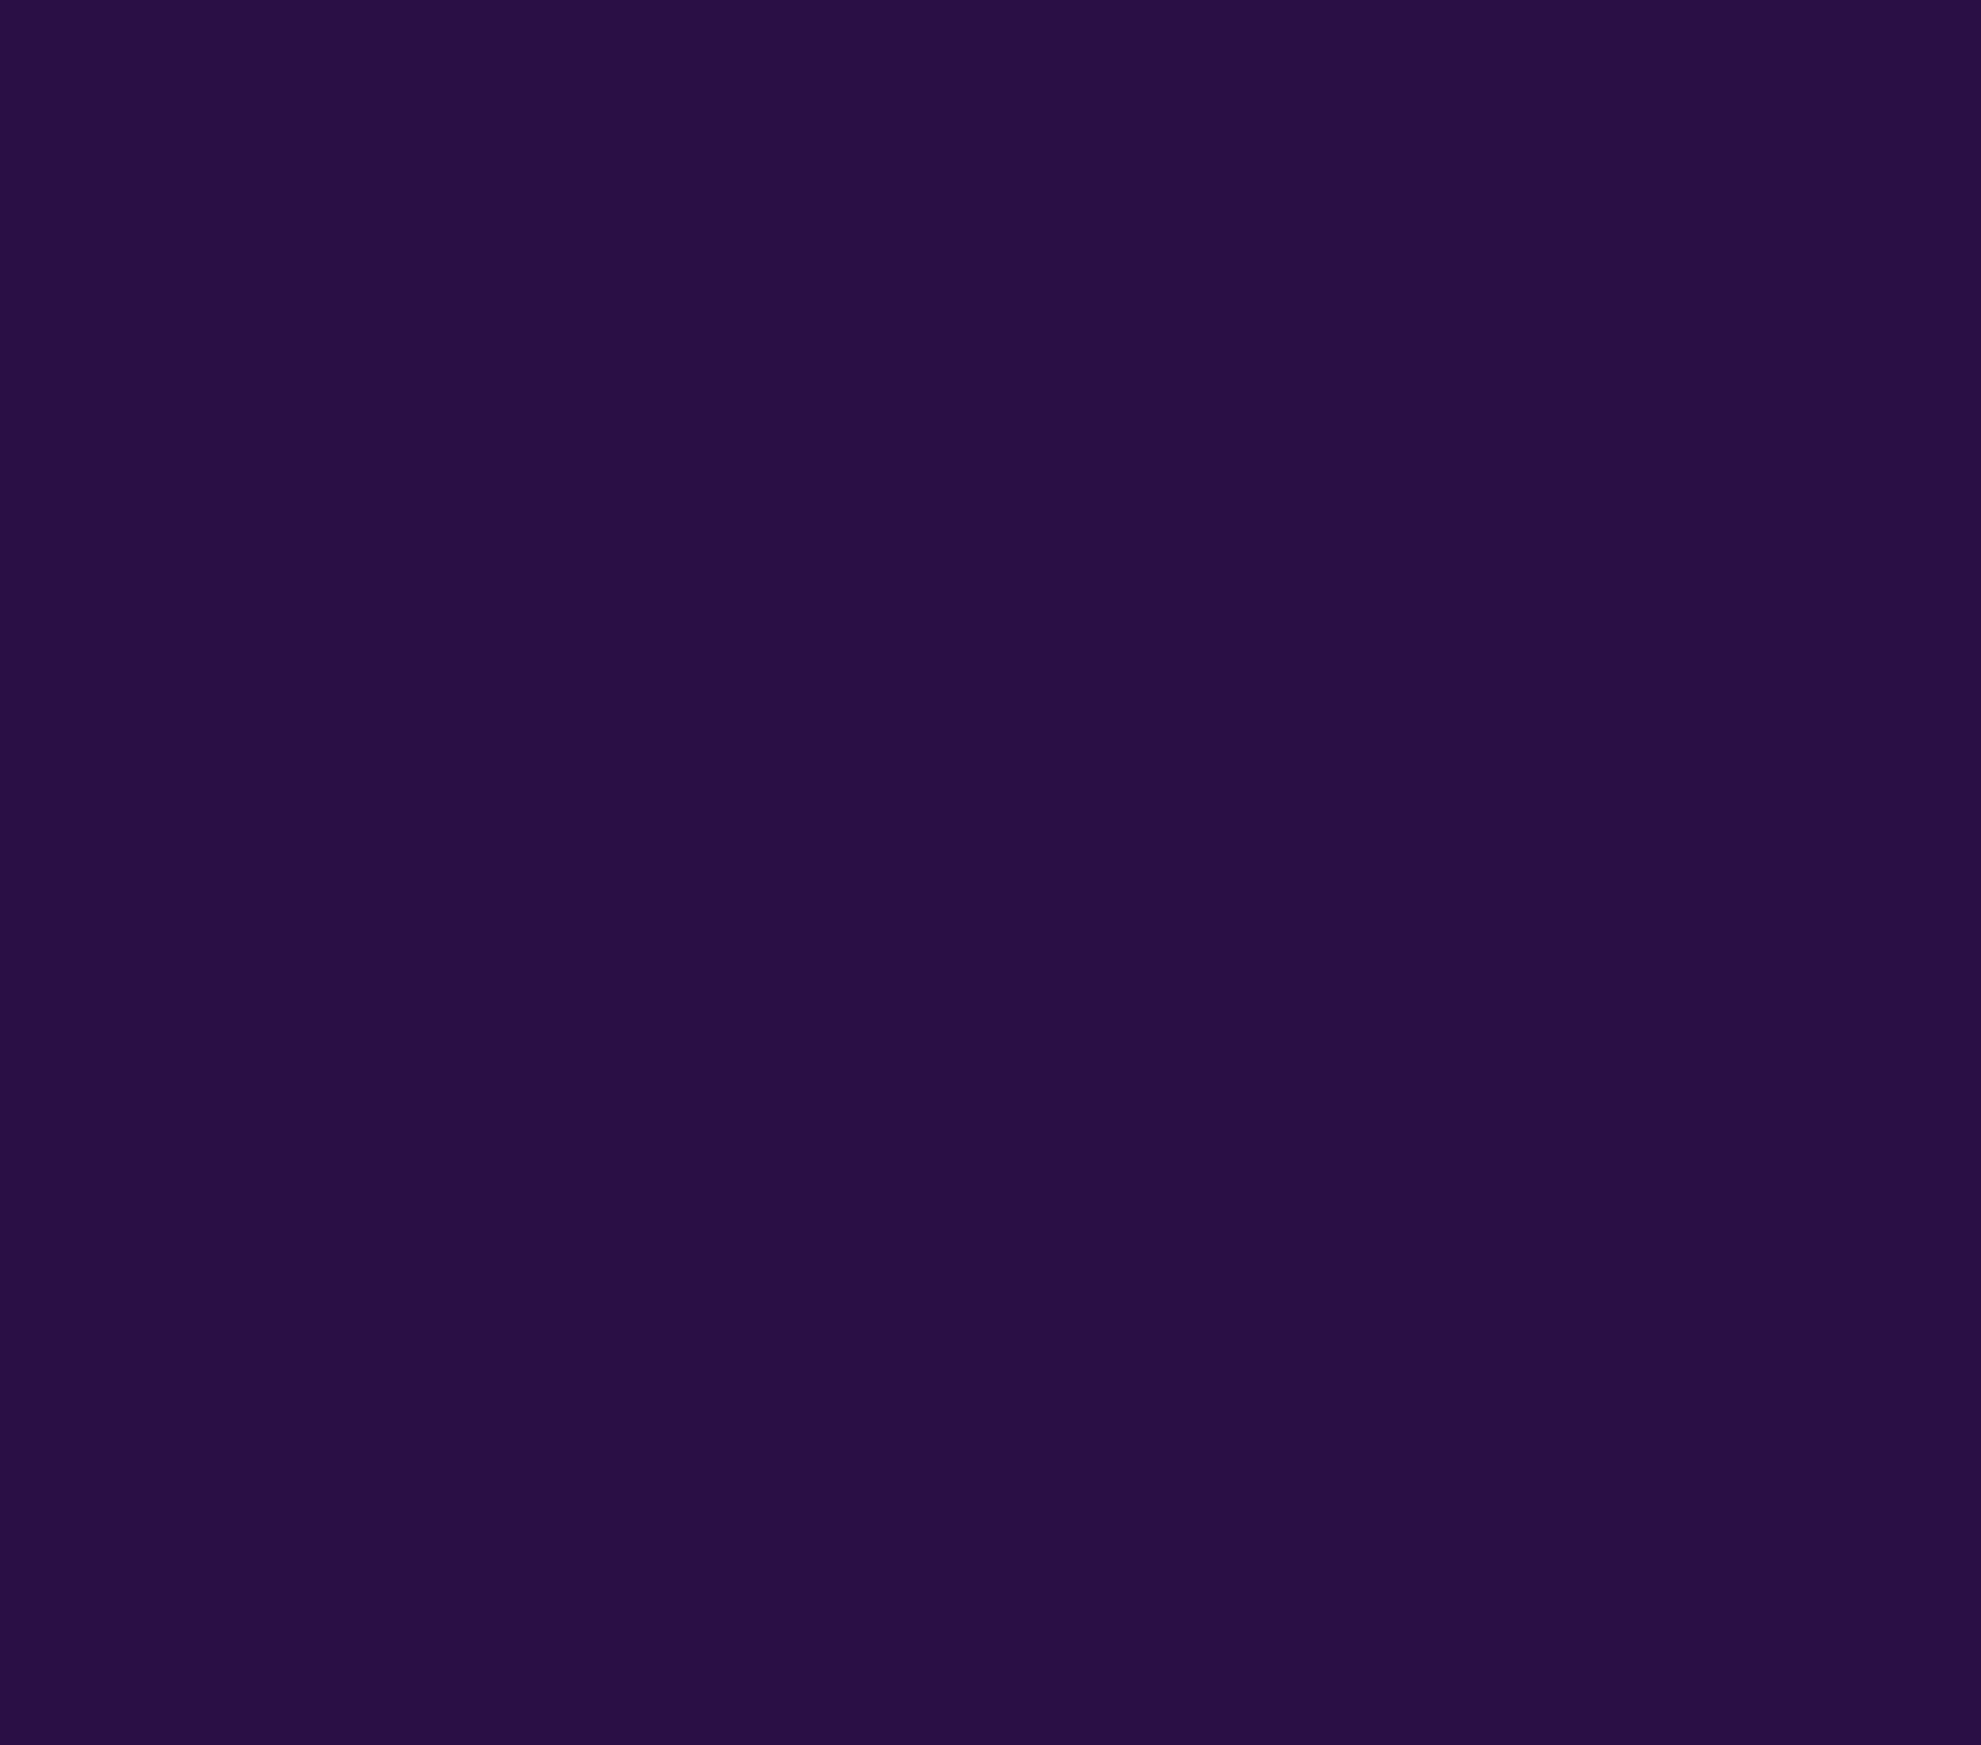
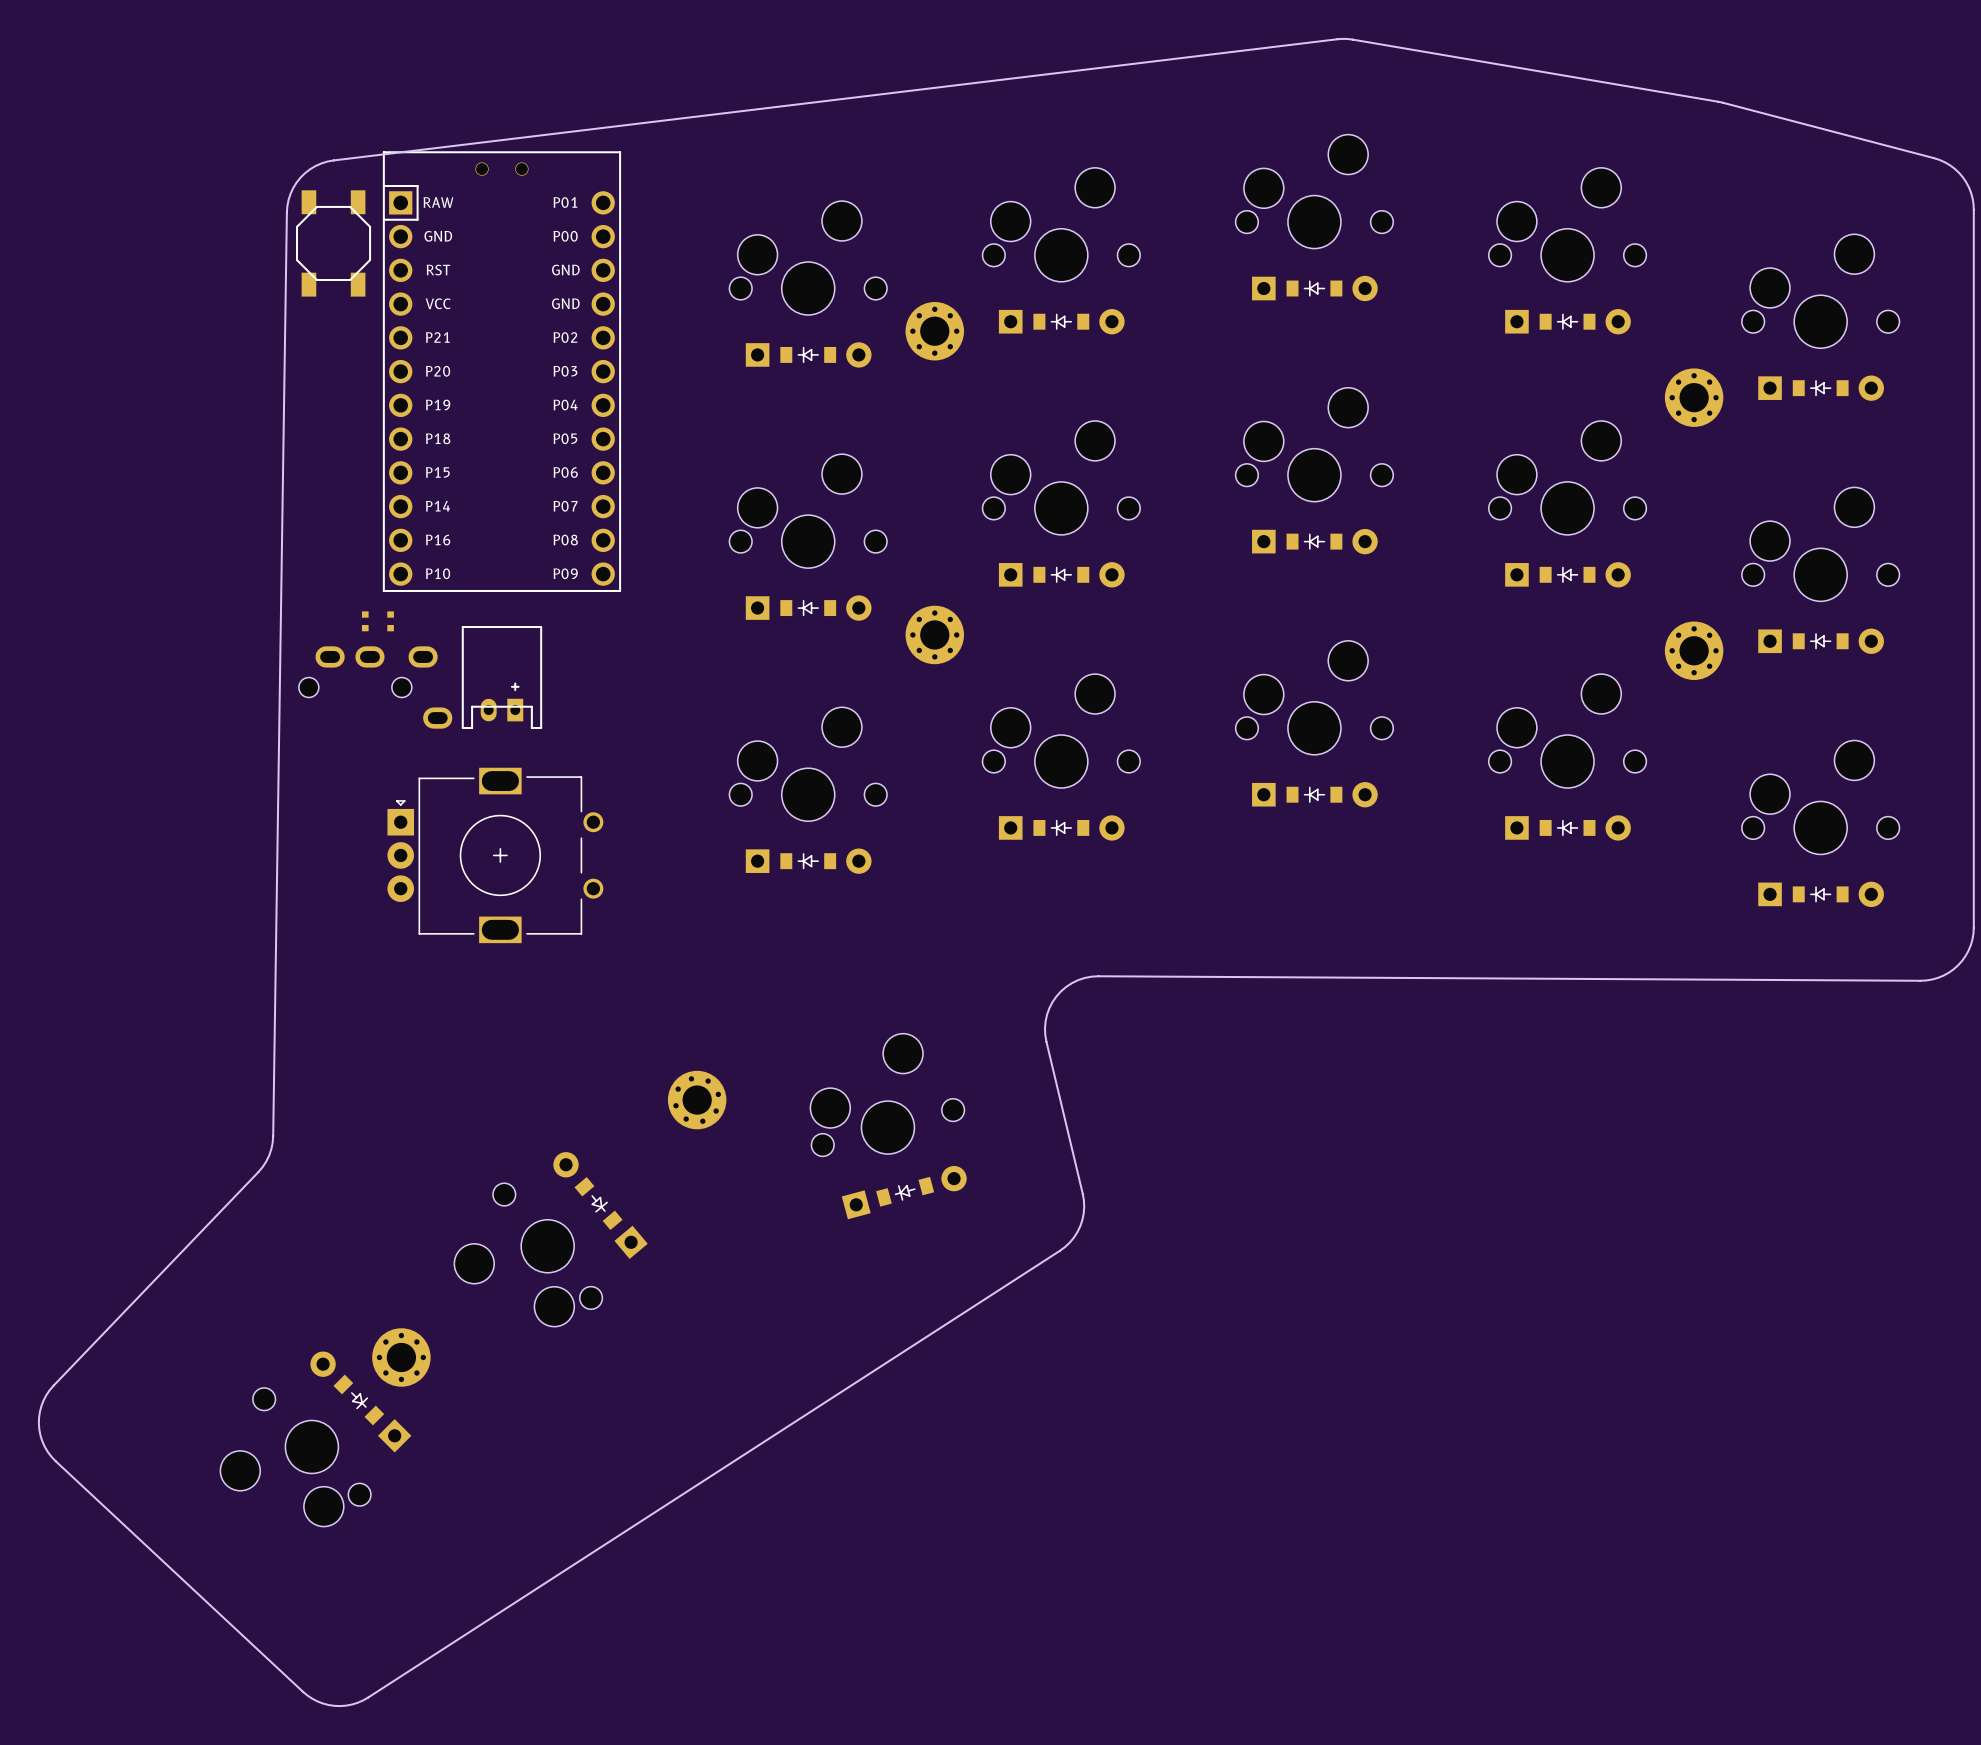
board edge: none -> (1337, 39) (333, 160) (321, 163) (310, 169) (296, 182) (290, 193) (286, 212) (273, 1136) (271, 1149) (266, 1161) (258, 1172) (49, 1390) (41, 1406) (38, 1423) (42, 1441) (55, 1461) (312, 1698) (328, 1705) (340, 1706) (352, 1704) (368, 1697) (1065, 1246) (1074, 1237) (1080, 1225) (1083, 1213) (1083, 1200) (1046, 1041) (1045, 1028) (1047, 1014) (1052, 1002) (1066, 986) (1078, 980) (1098, 976) (1920, 980) (1937, 977) (1948, 972) (1965, 956) (1970, 945) (1973, 927) (1973, 209) (1970, 192) (1966, 181) (1954, 168) (1939, 159) (1720, 102) (1352, 39) (1337, 39)
part: none -> (501, 169)
part: none -> (1314, 191)
part: none -> (1061, 224)
part: none -> (1567, 224)
part: none -> (333, 243)
part: none -> (808, 258)
part: none -> (1314, 288)
part: none -> (1820, 291)
part: none -> (1061, 321)
part: none -> (1567, 321)
part: none -> (934, 331)
part: none -> (808, 354)
part: none -> (501, 371)
part: none -> (1821, 388)
part: none -> (1694, 397)
part: none -> (1314, 444)
part: none -> (1061, 477)
part: none -> (1567, 477)
part: none -> (808, 511)
part: none -> (1314, 541)
part: none -> (1820, 544)
part: none -> (1061, 574)
part: none -> (1567, 574)
part: none -> (808, 608)
part: none -> (365, 621)
part: none -> (390, 621)
part: none -> (934, 634)
part: none -> (1821, 641)
part: none -> (1694, 650)
part: none -> (501, 677)
part: none -> (375, 687)
part: none -> (1314, 697)
part: none -> (1061, 731)
part: none -> (1567, 731)
part: none -> (808, 764)
part: none -> (1314, 794)
part: none -> (1820, 797)
part: none -> (1061, 827)
part: none -> (1567, 827)
part: none -> (495, 855)
part: none -> (808, 861)
part: none -> (1821, 894)
part: none -> (887, 1095)
part: none -> (697, 1100)
part: none -> (904, 1192)
part: none -> (600, 1205)
part: none -> (528, 1254)
part: none -> (401, 1357)
part: none -> (360, 1402)
part: none -> (295, 1457)

